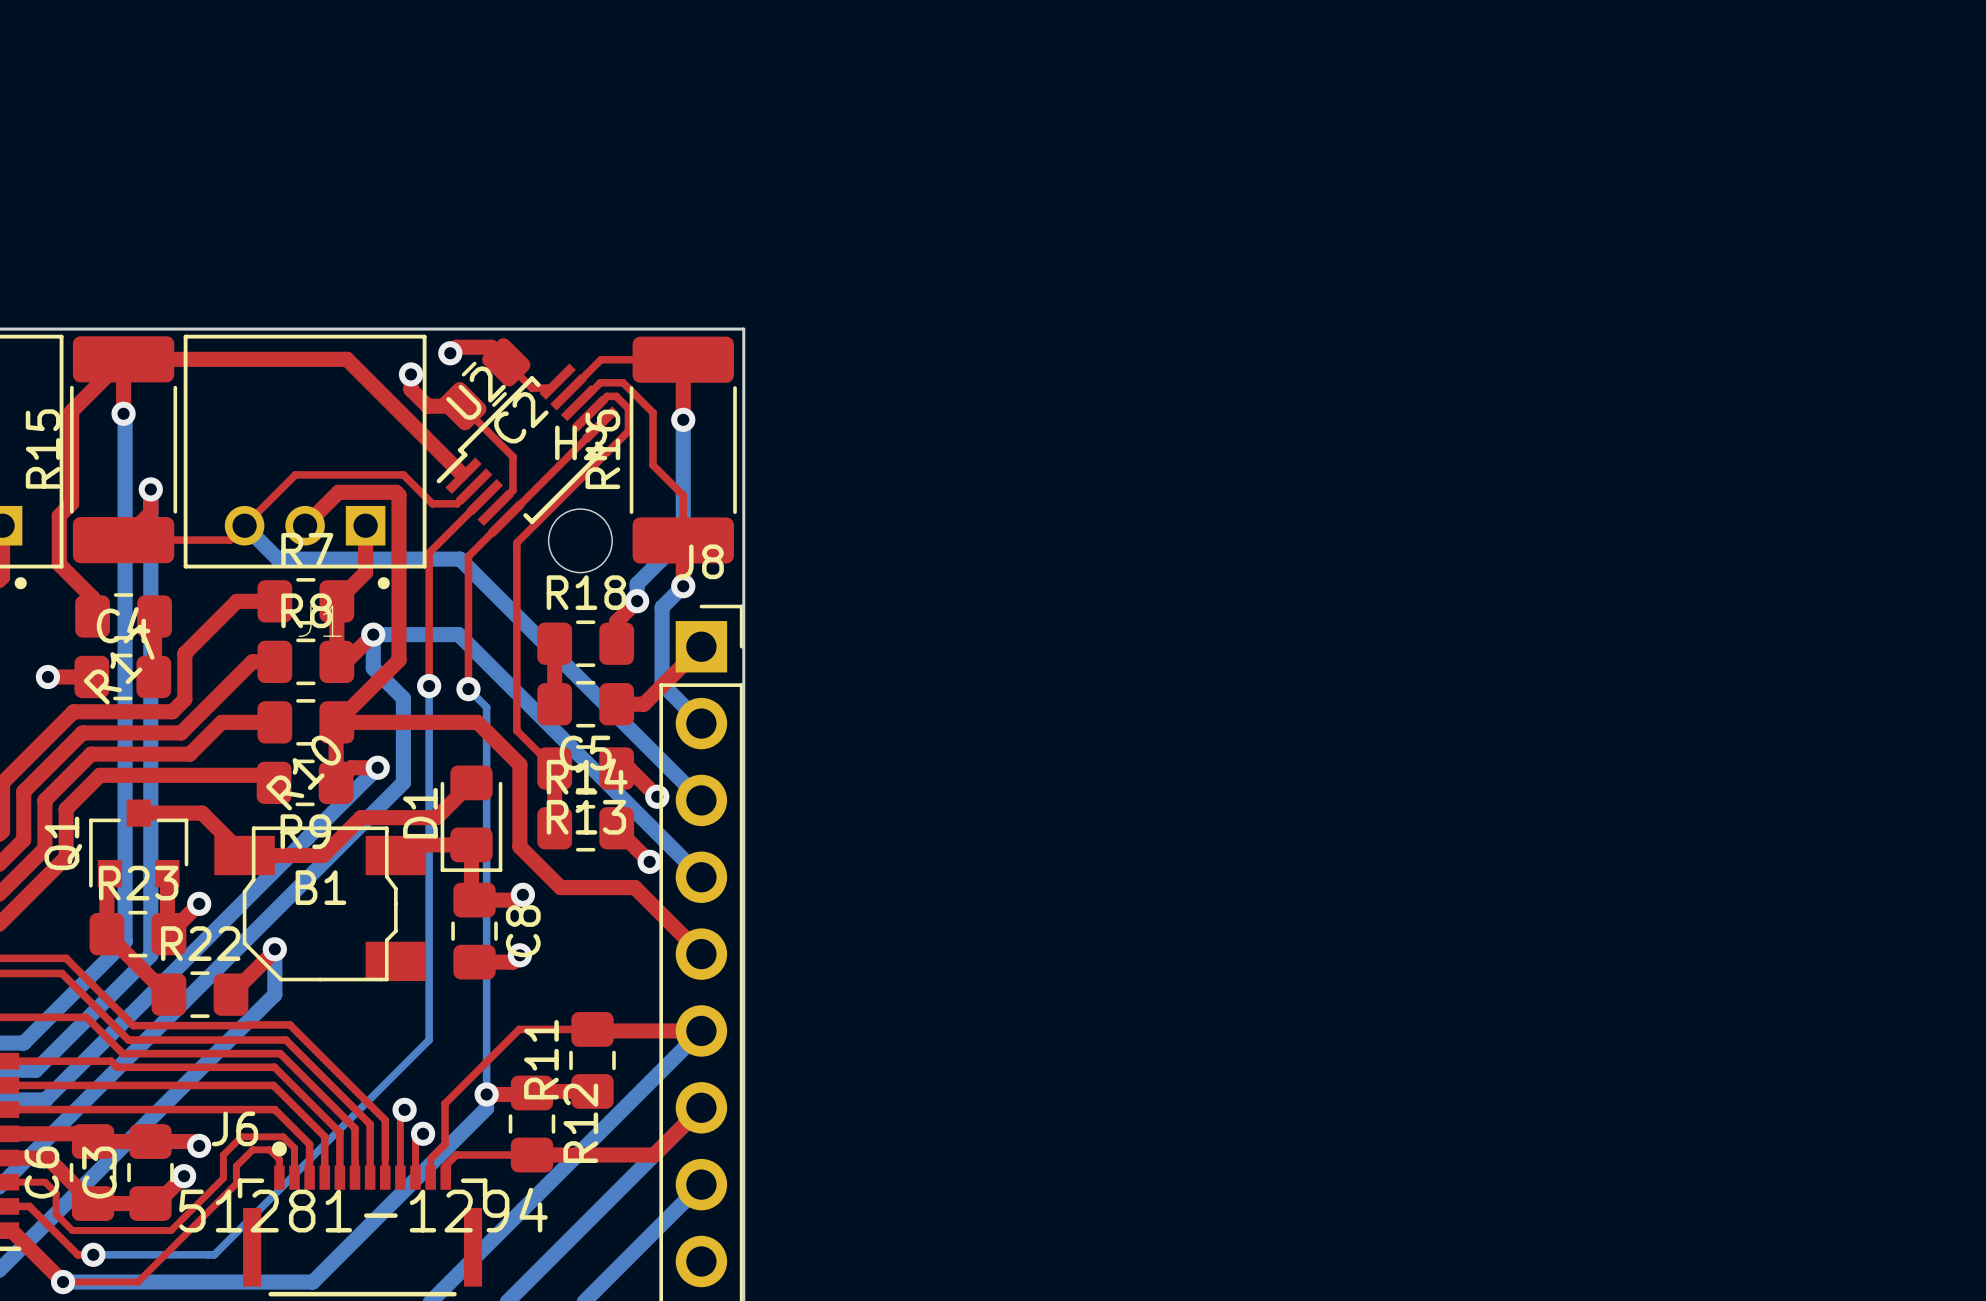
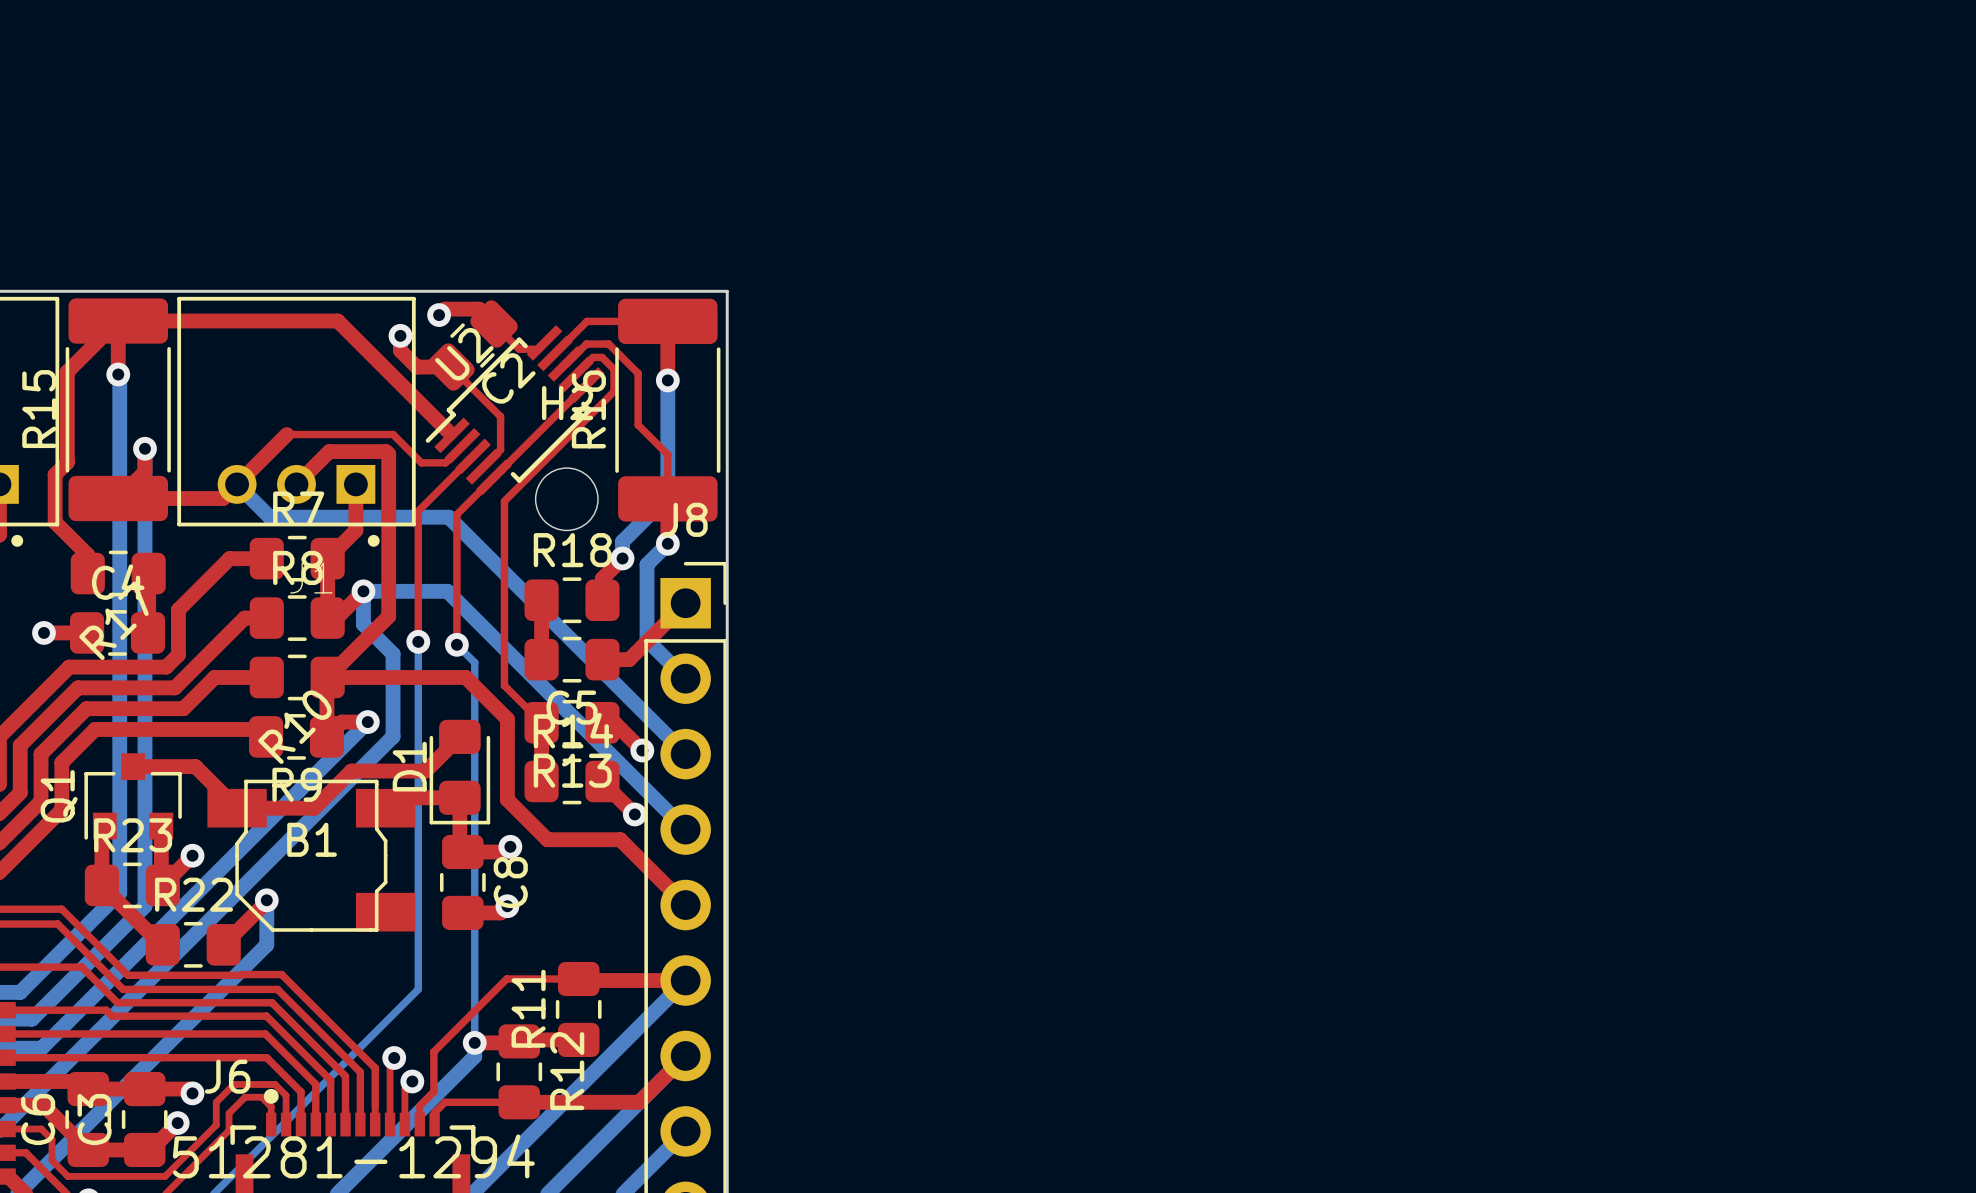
top track width: thin (295, 474) (230, 540) (123, 540) -> thick (286, 434) (222, 498) (118, 498)

